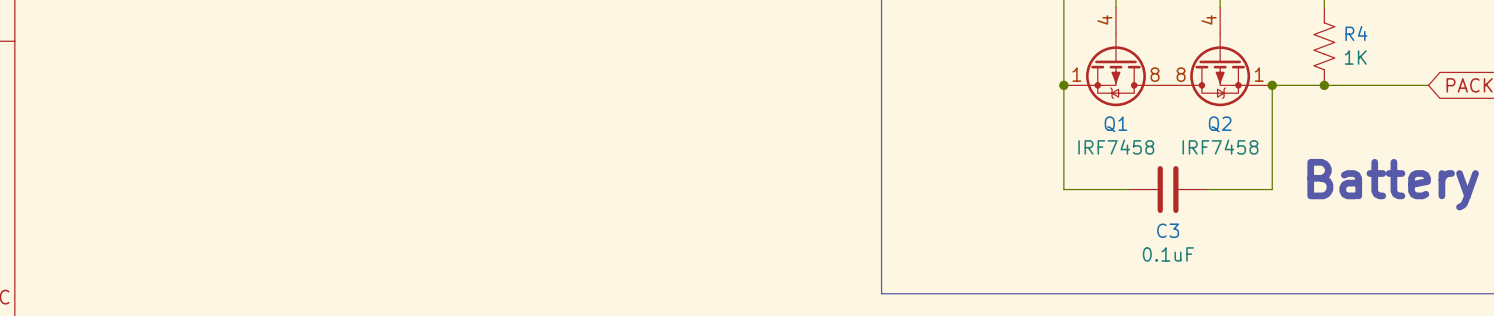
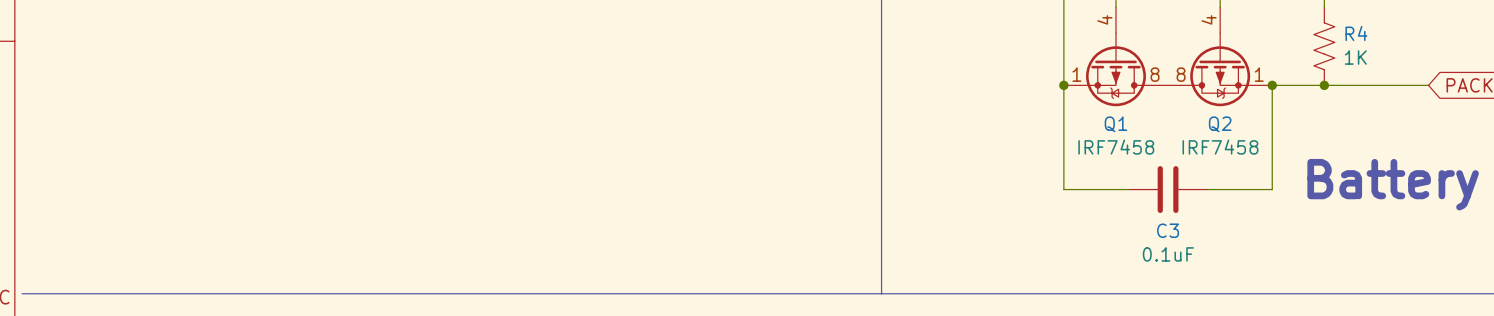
line: none -> (22, 293) (881, 293)

